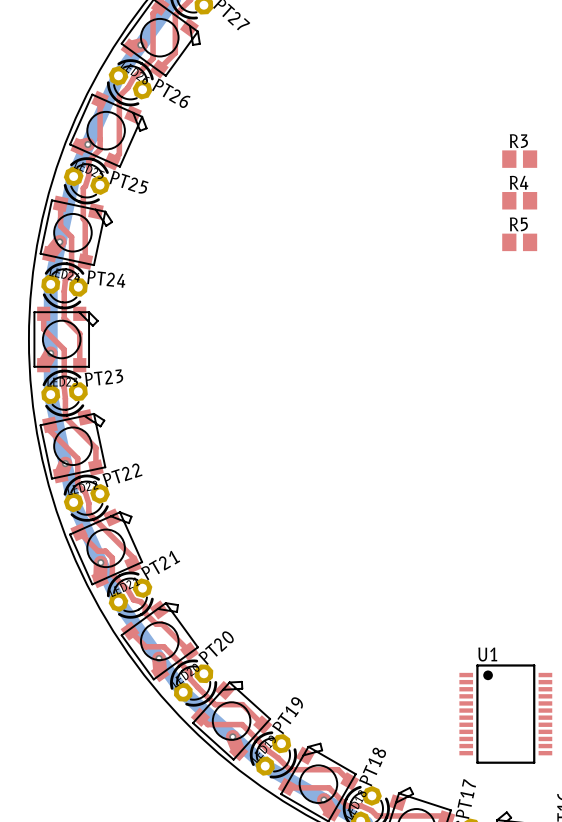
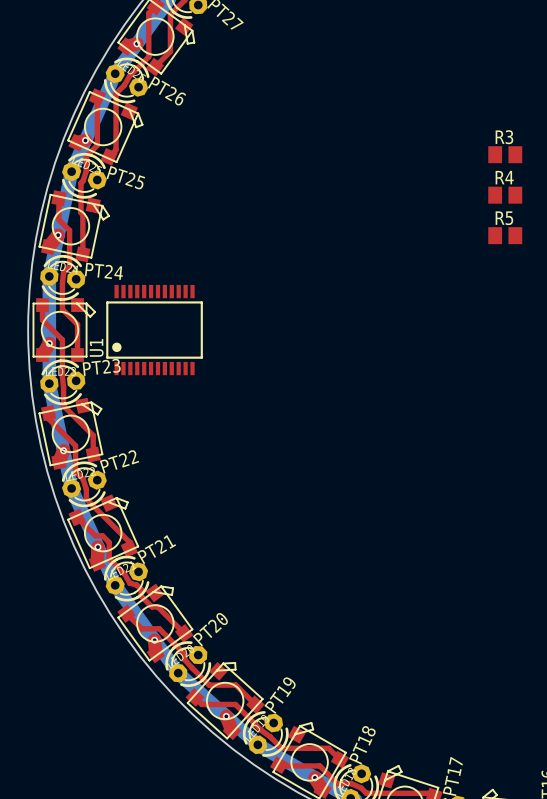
U1 rotation: 0° (505, 714) -> 90° counterclockwise (154, 330)
U1 position: (505, 714) -> (154, 330)

